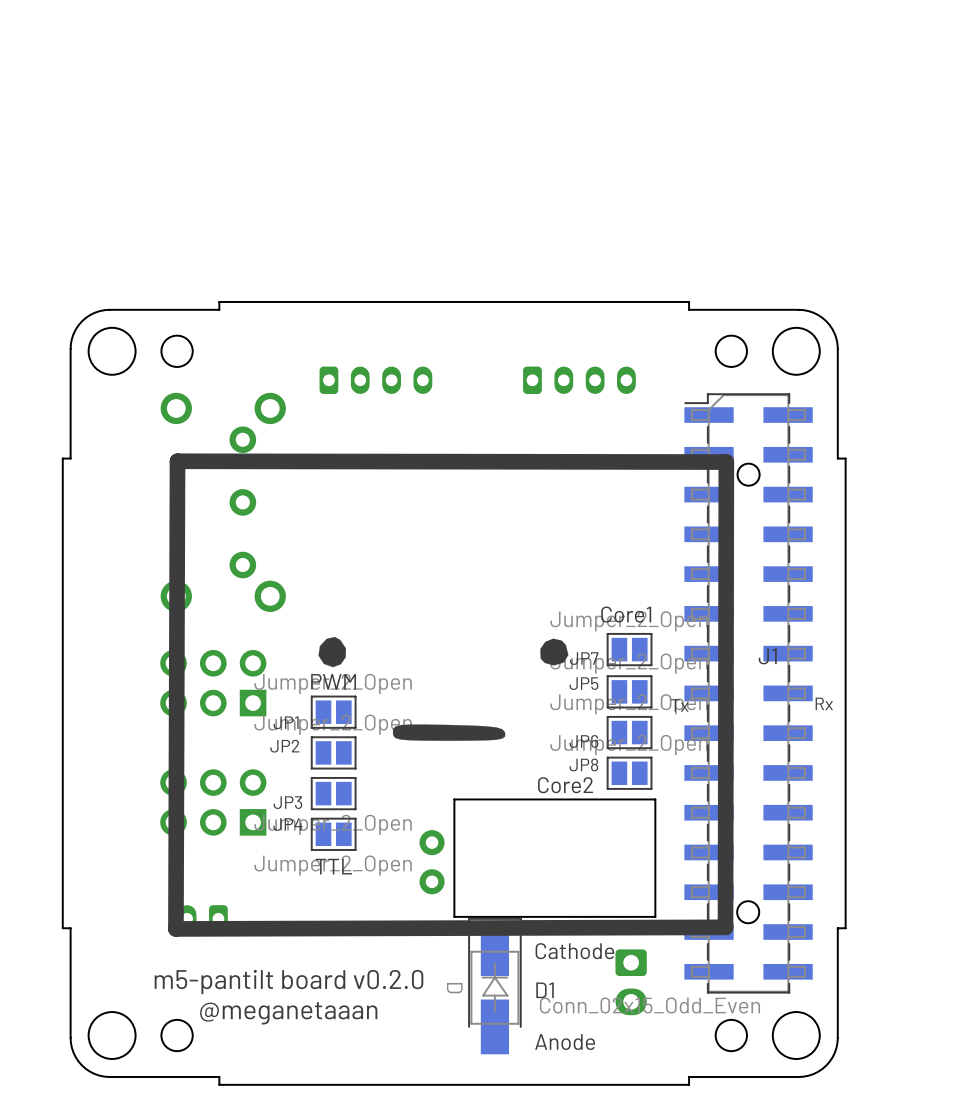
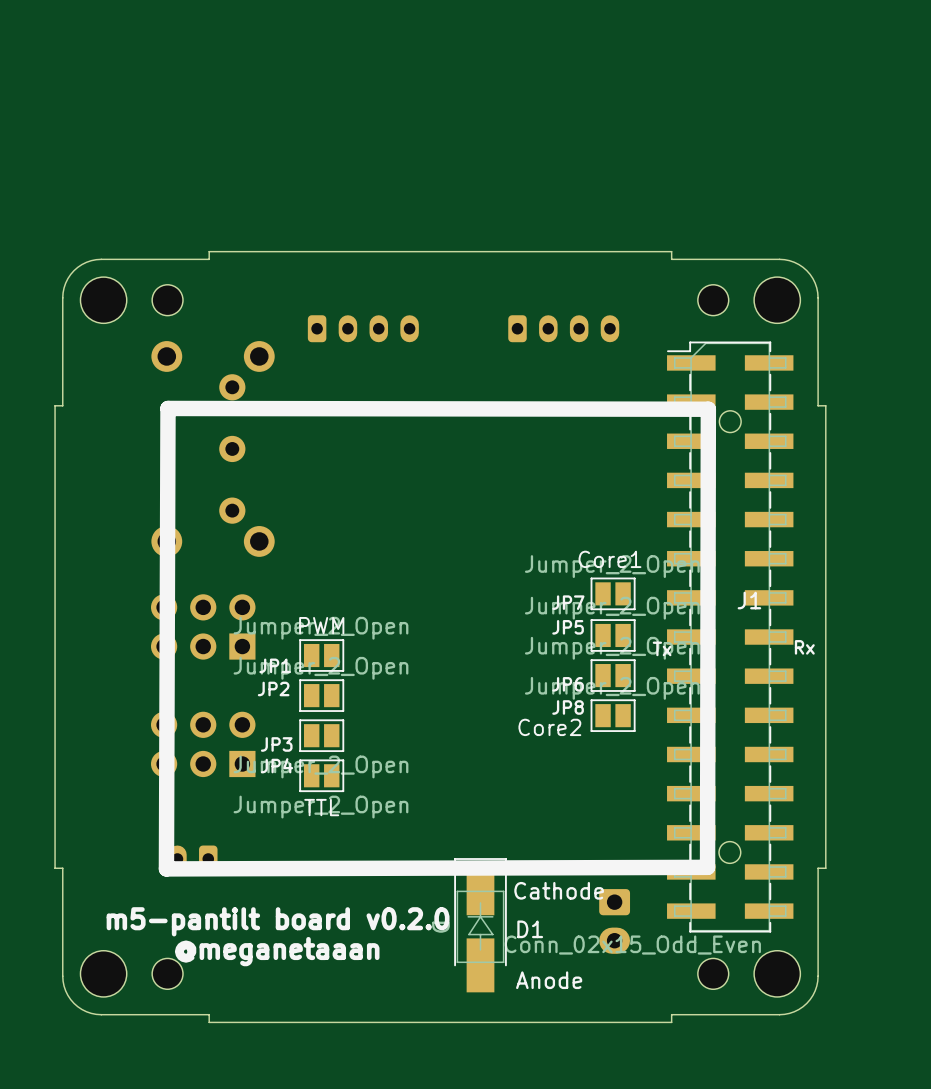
drawing: [318, 636, 569, 741] -> none
board edge: (655, 799) (655, 916) (454, 916) (454, 799) (655, 799) -> none
part: (432, 862) -> none

